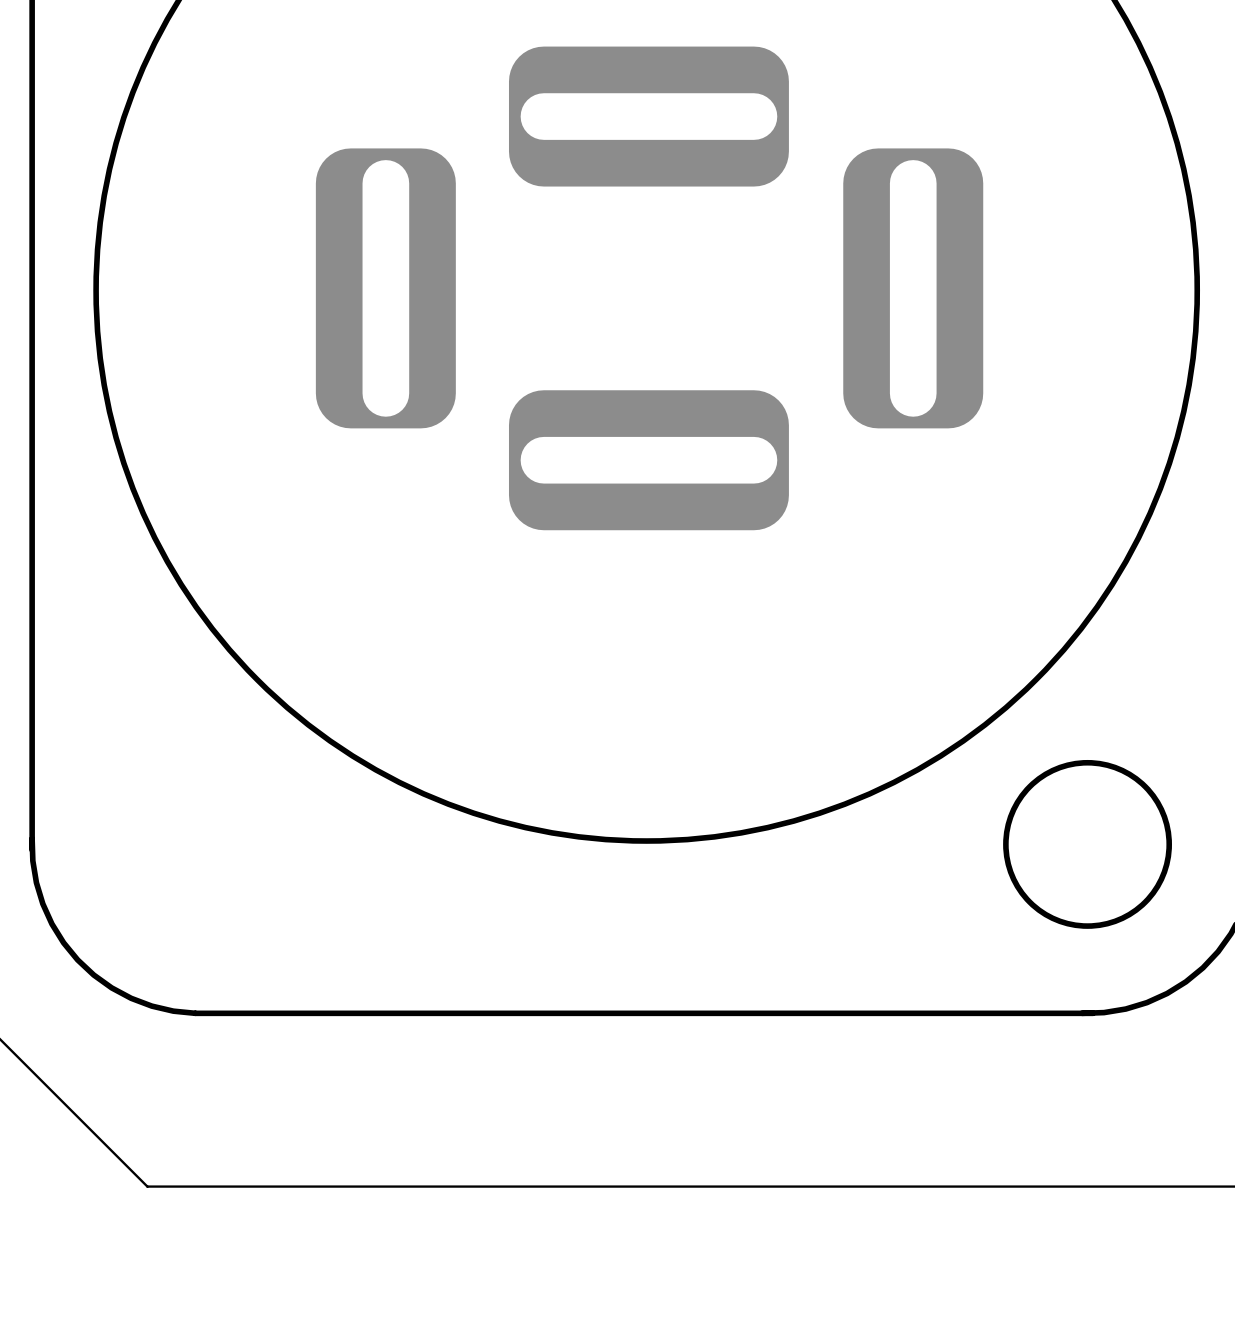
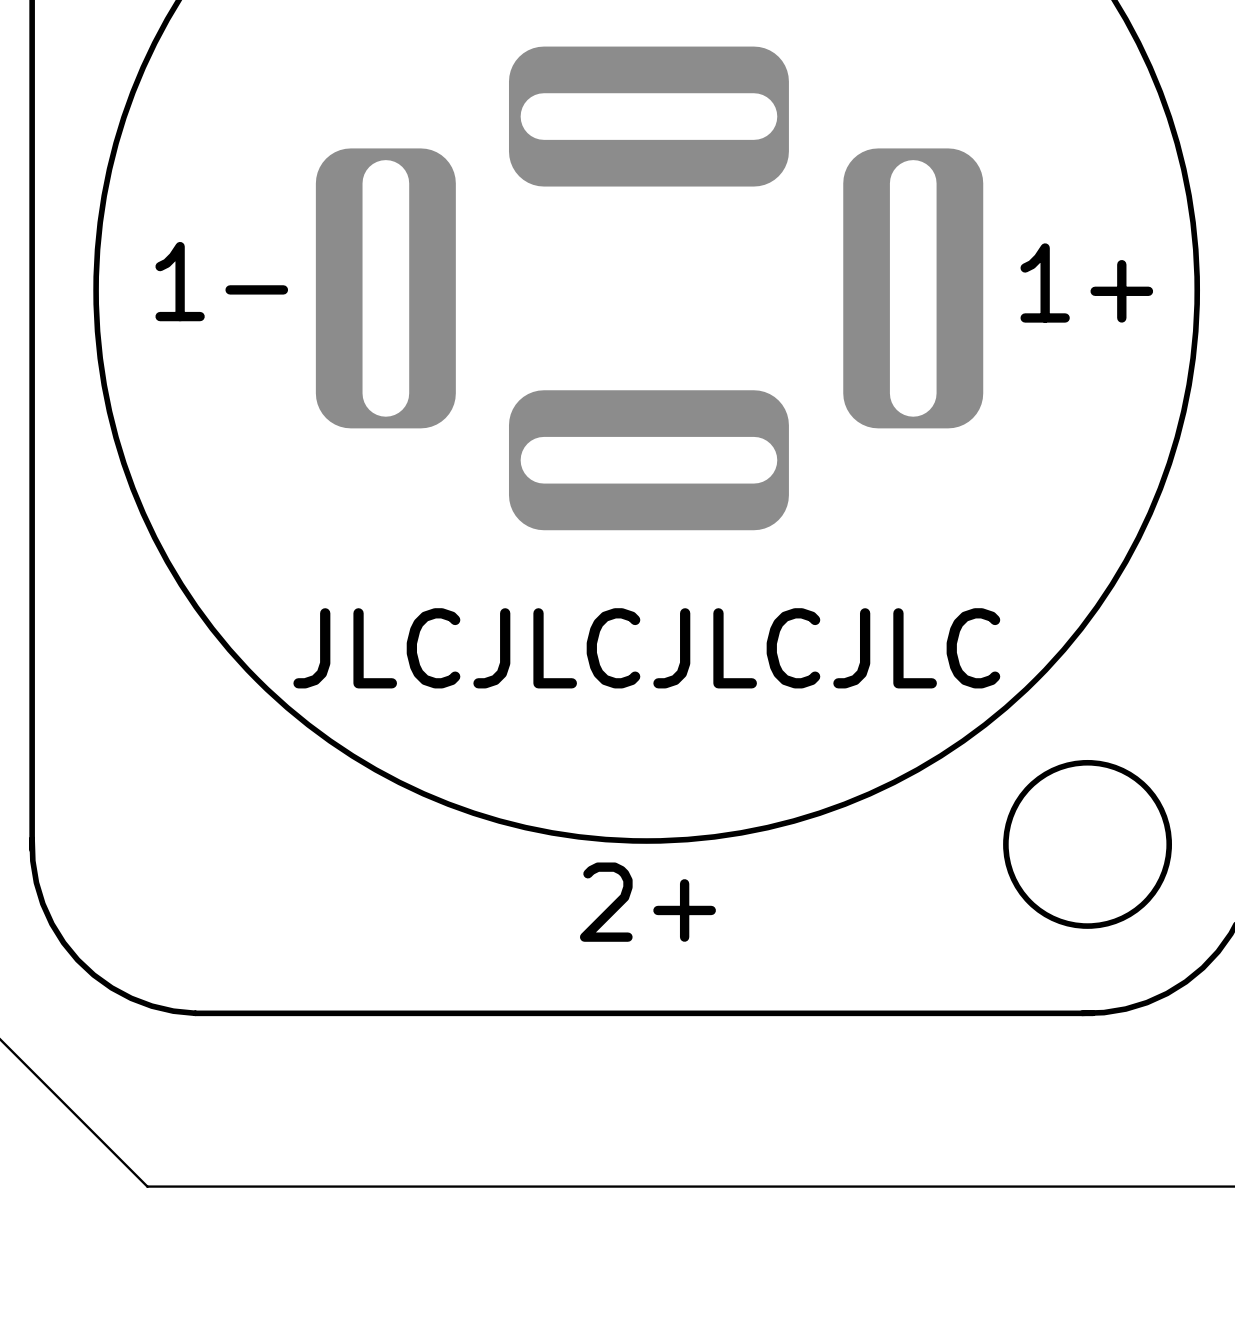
text: none -> 1- (221, 281)
text: none -> 1+ (1086, 282)
text: none -> JLCJLCJLCJLC (646, 648)
text: none -> 2+ (647, 902)

